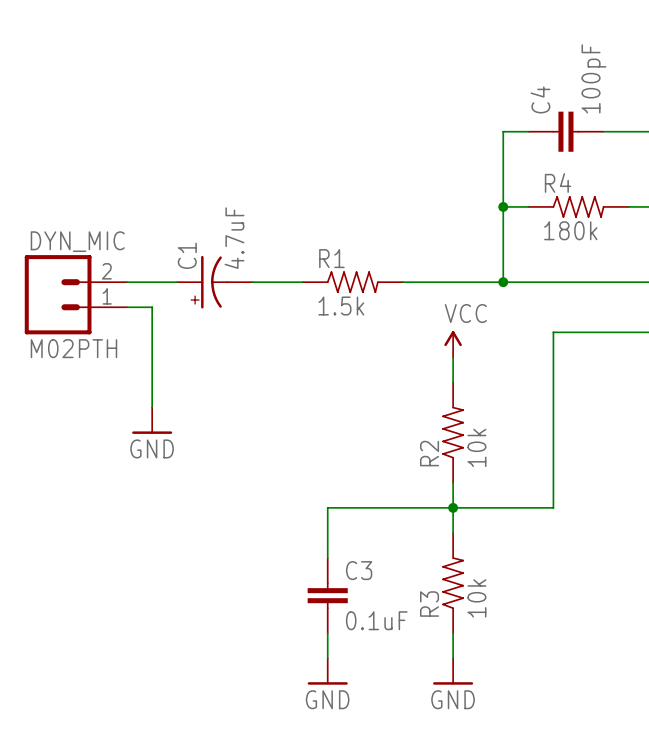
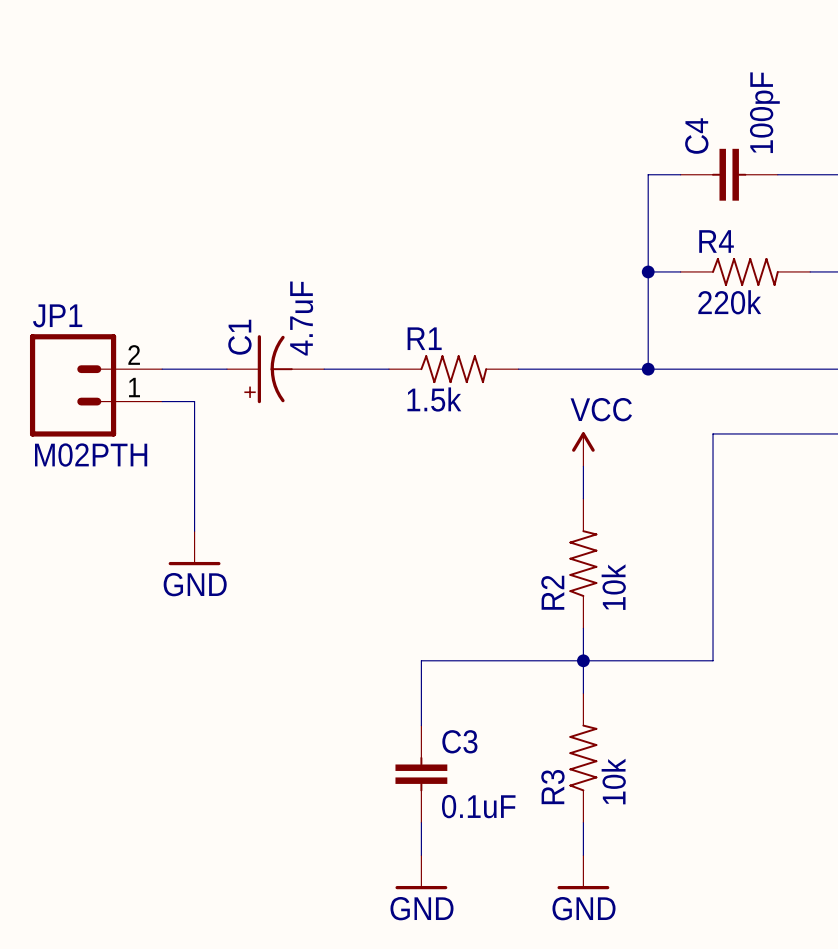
R4 value: 180k (570, 230) -> 220k (729, 302)
DYN_MIC name: DYN_MIC (77, 241) -> JP1 (57, 315)

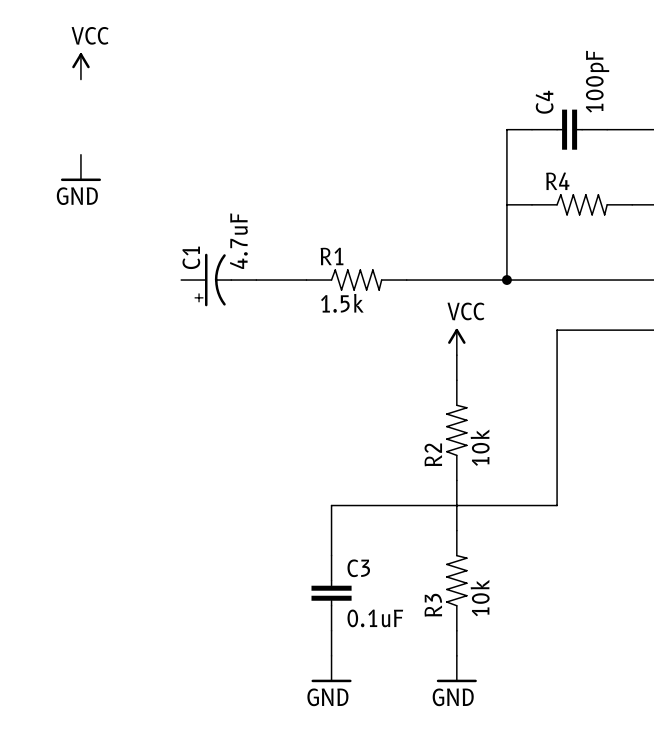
power symbol: none -> VCC (80, 66)
power symbol: none -> GND (80, 167)
junction: (648, 271) -> none
R4 value: 220k (729, 302) -> none
wire: (162, 369) (226, 369) -> none
JP1: M02PTH (96, 385) -> none
wire: (162, 401) (194, 401) (194, 531) -> none
power symbol: GND (194, 548) -> none
junction: (583, 660) -> none

